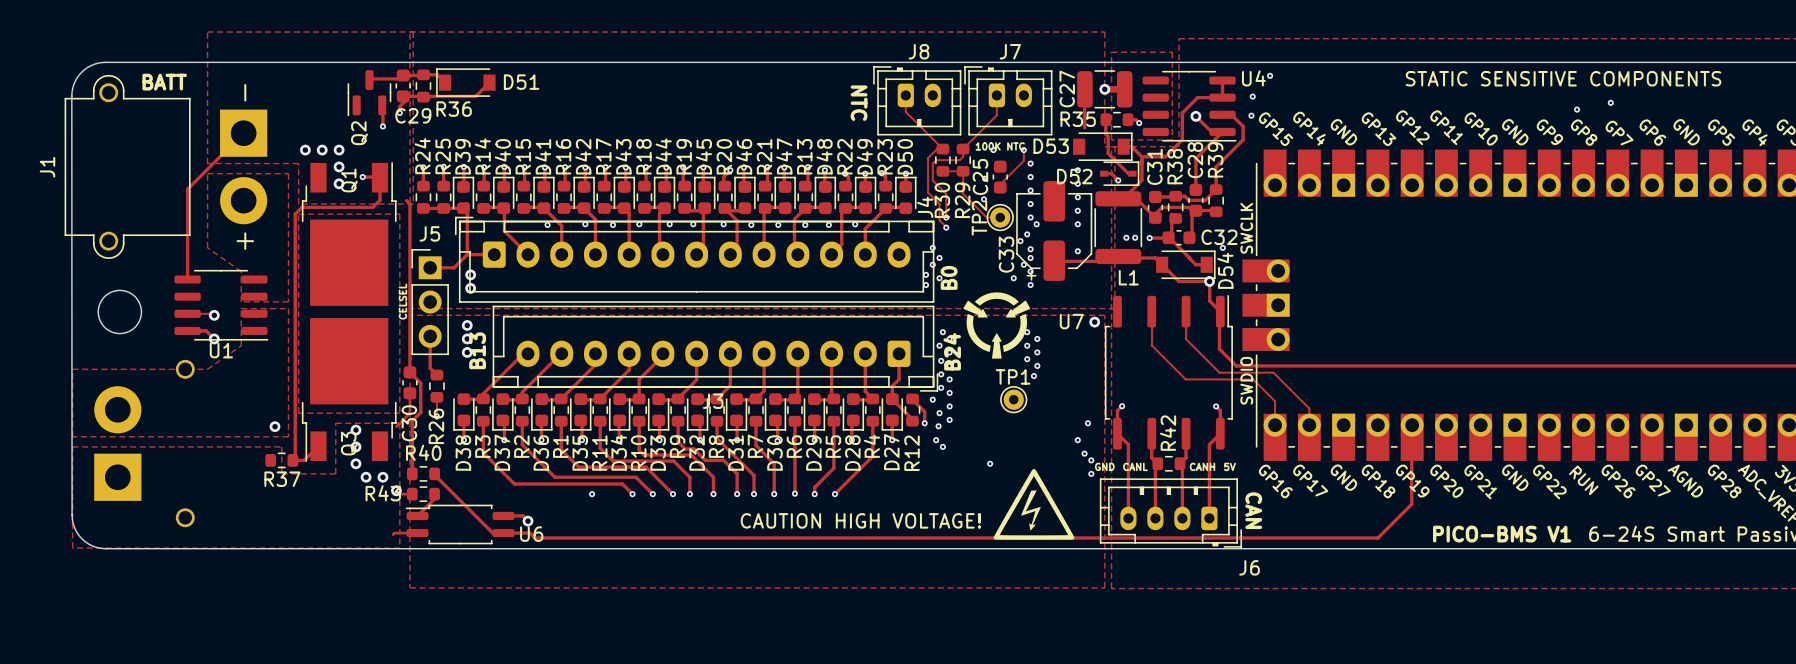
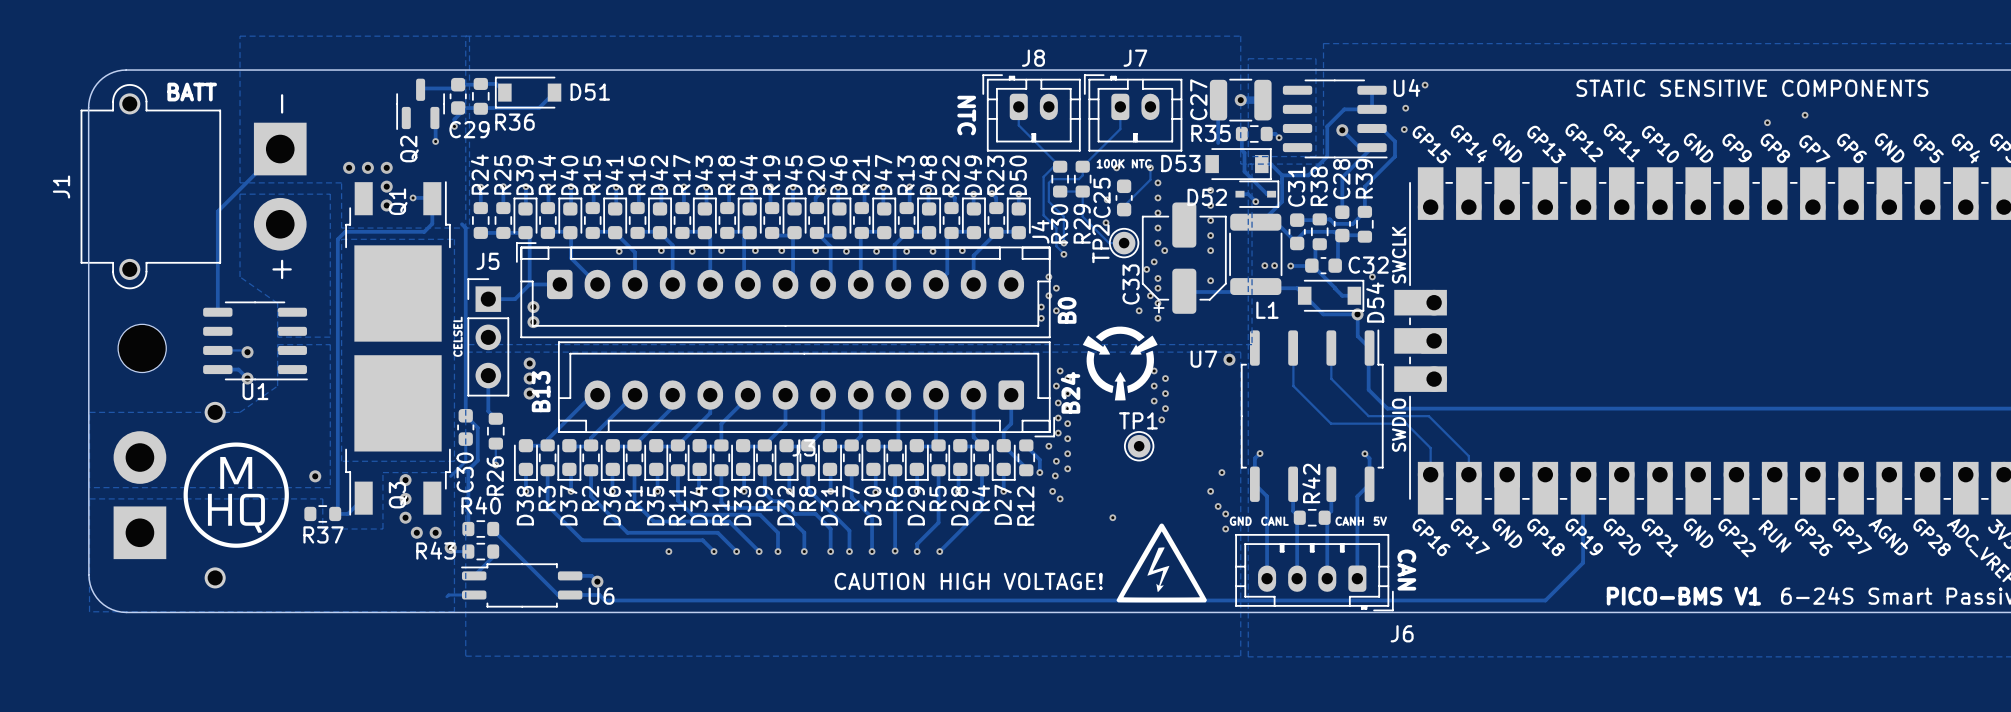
drawing: none -> [183, 442, 289, 548]

